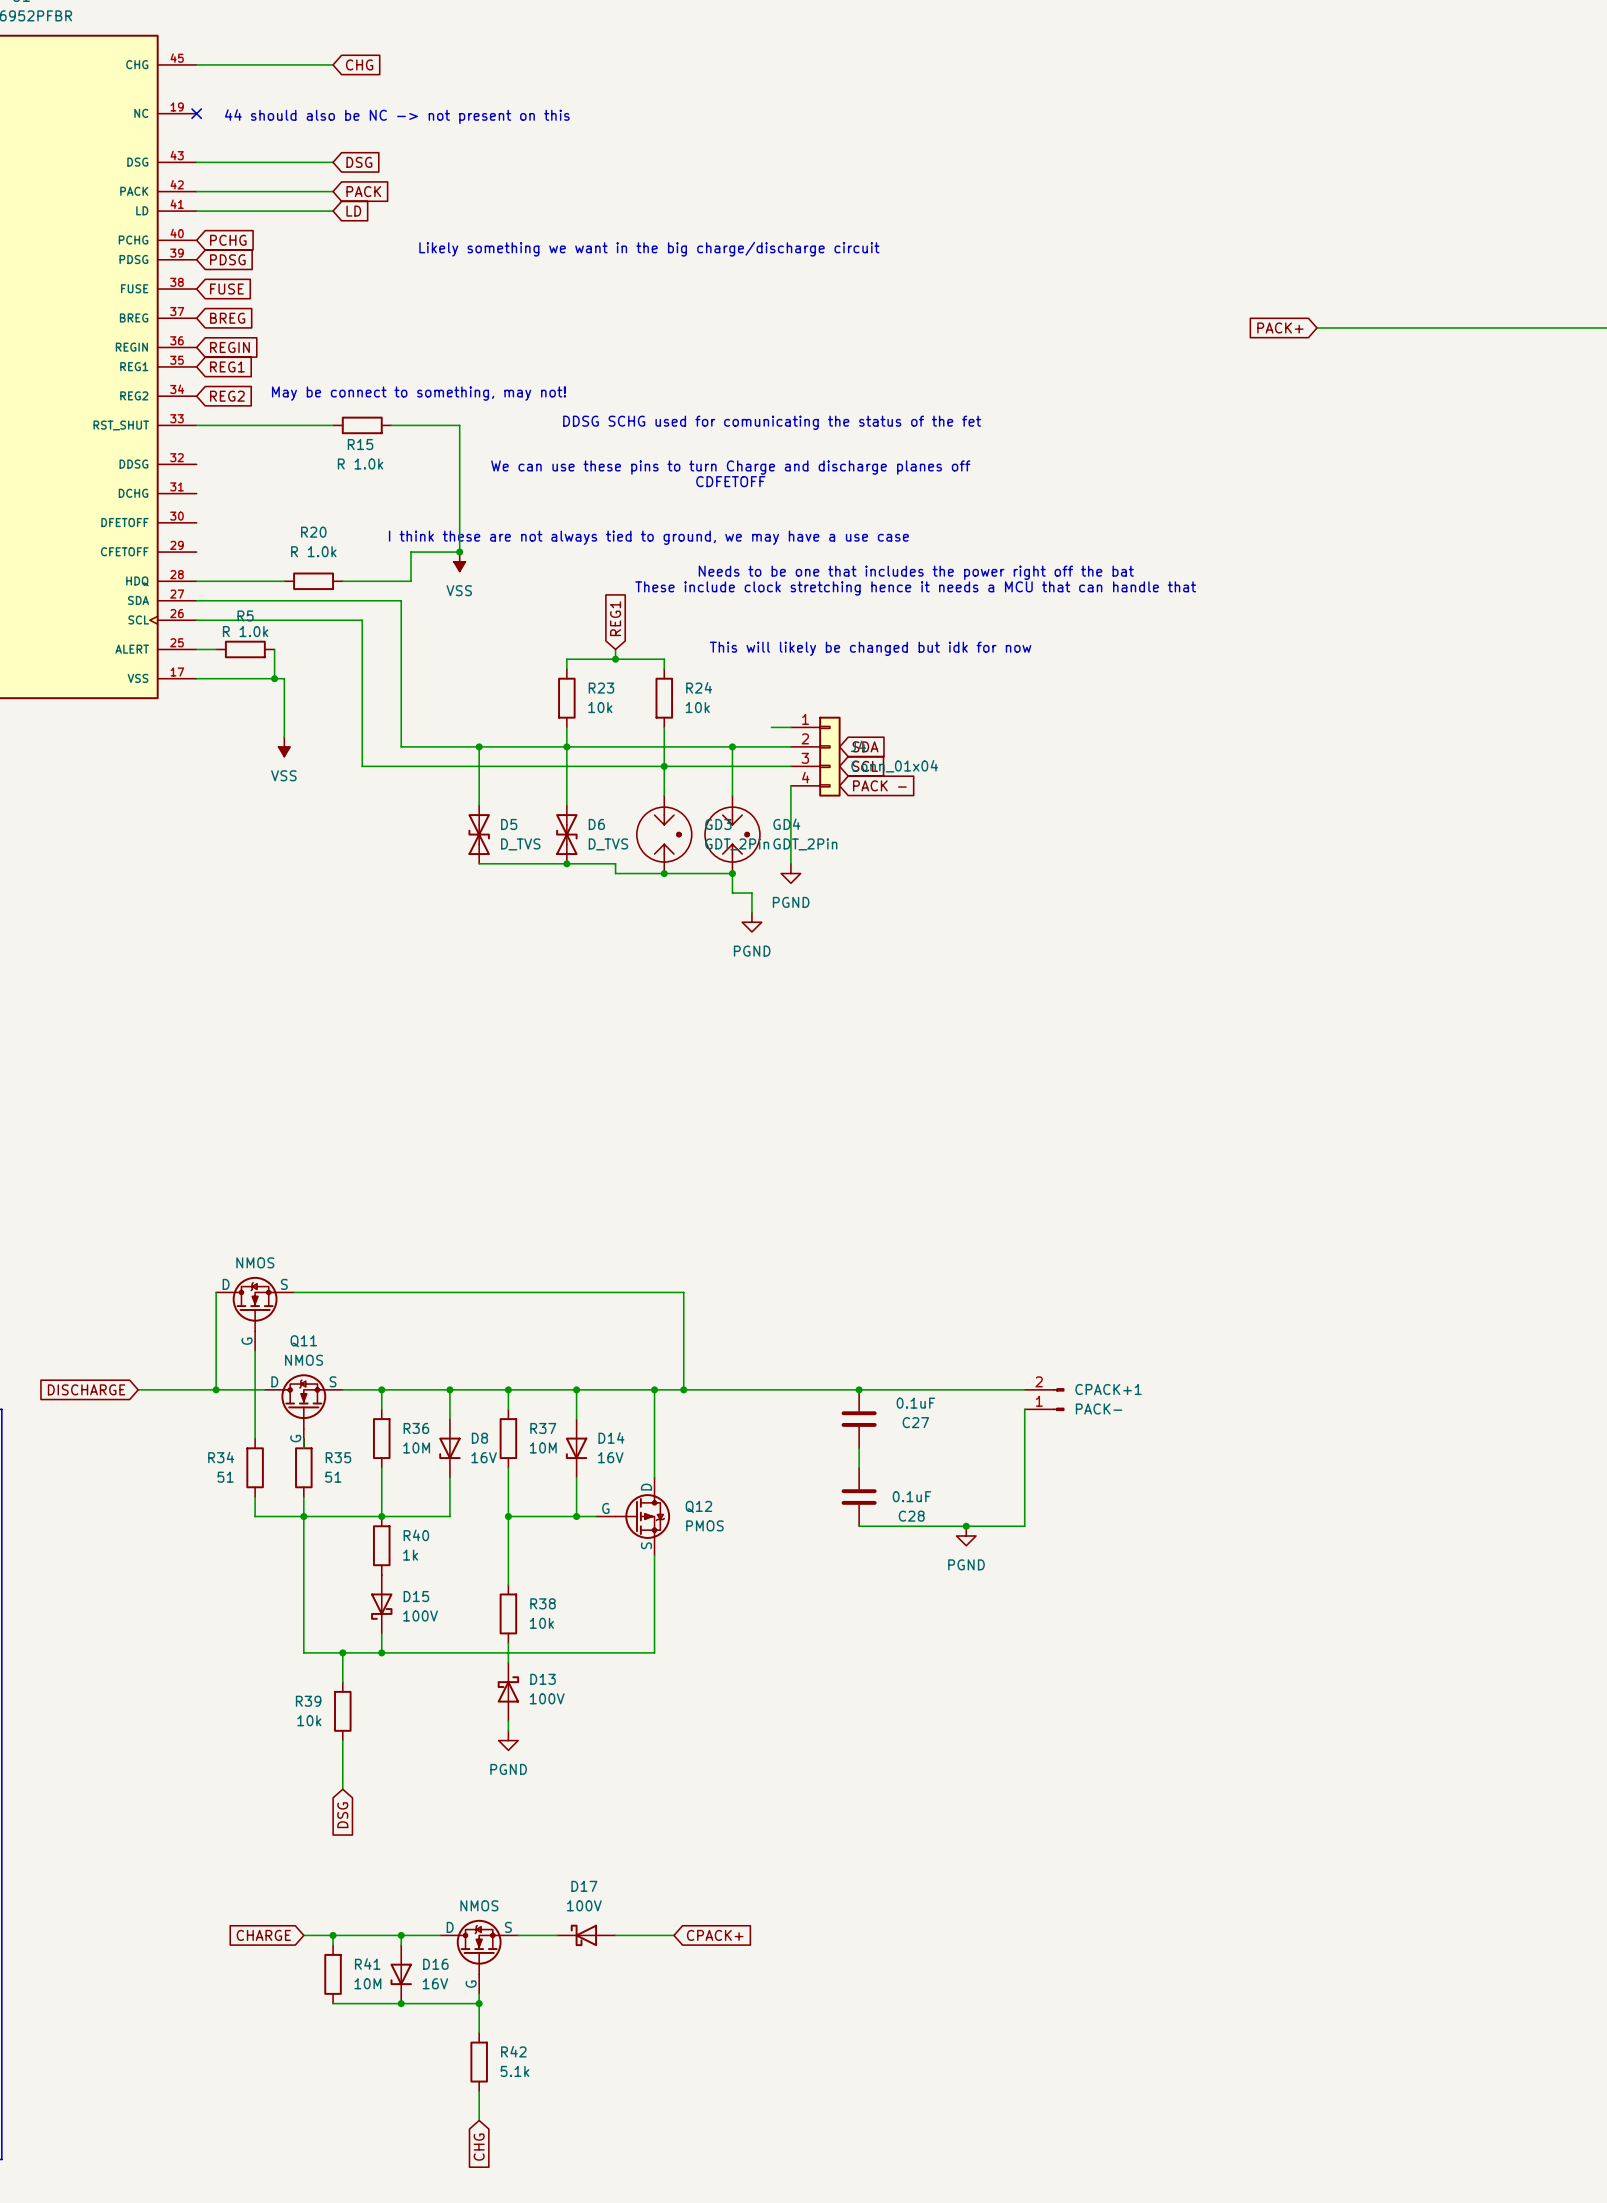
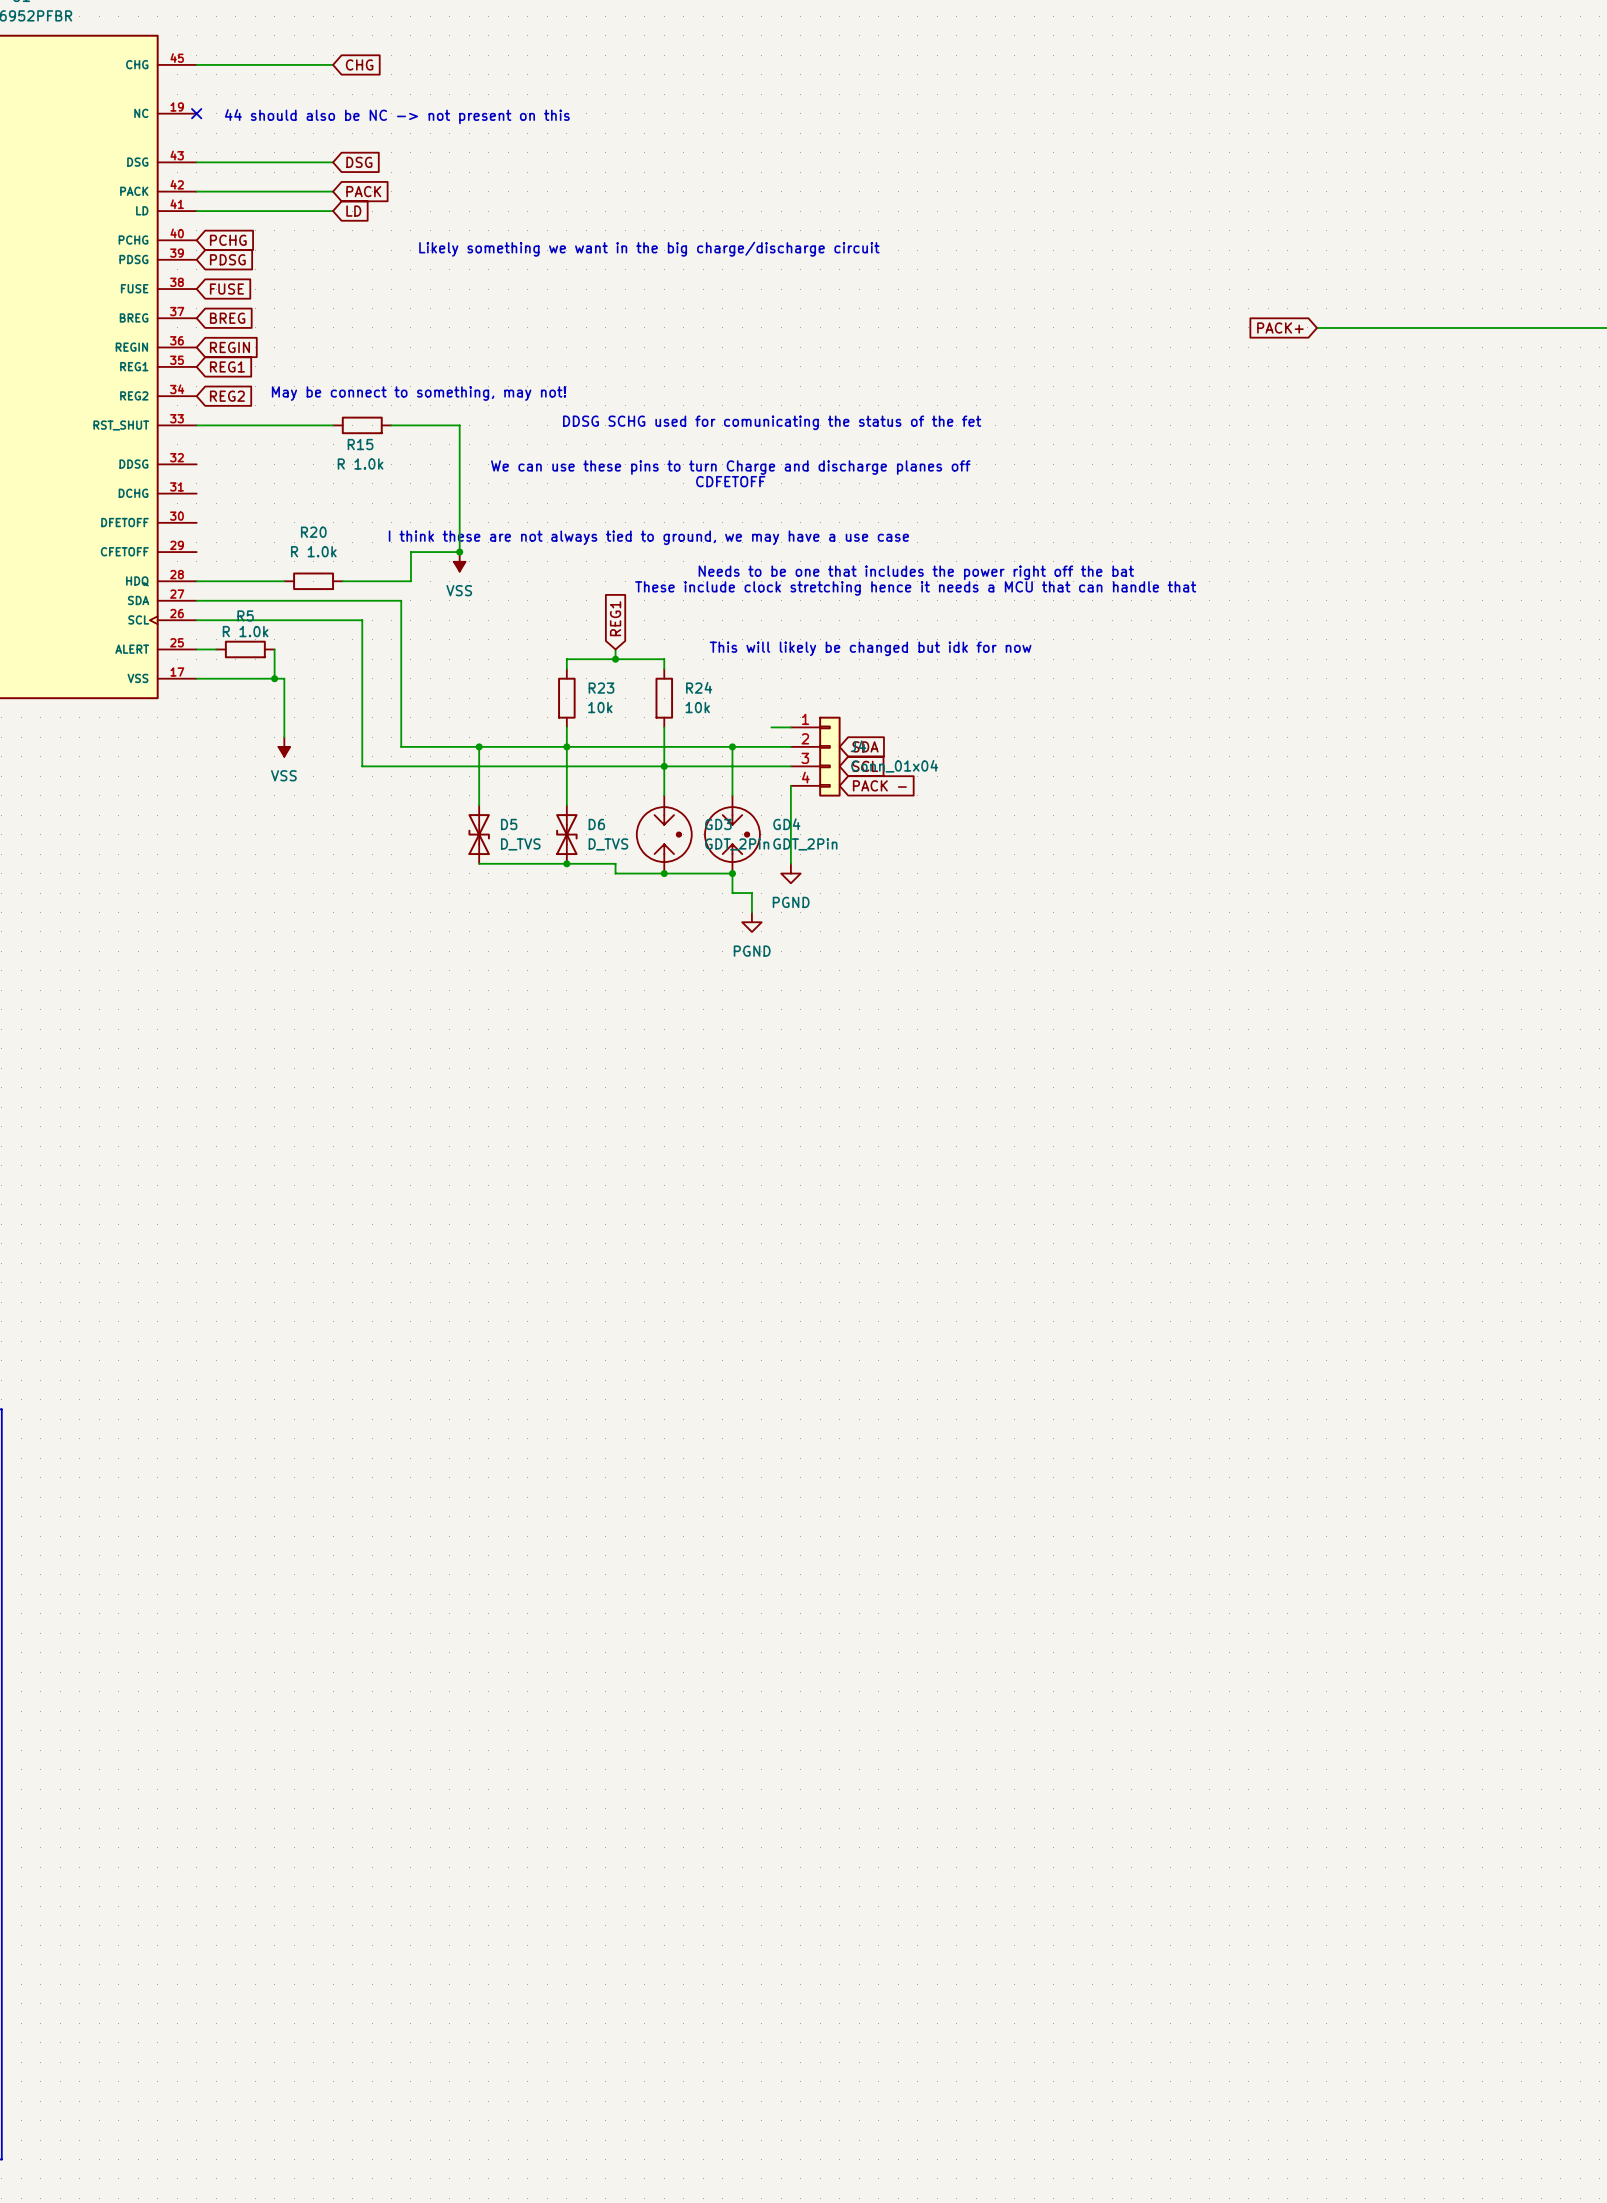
wire: (216, 1292) (216, 1389) -> none
wire: (294, 1292) (683, 1292) (683, 1389) -> none
part: NMOS (255, 1313) -> none
wire: (255, 1350) (255, 1438) -> none
global label: DISCHARGE (86, 1389) -> none
wire: (138, 1389) (264, 1389) -> none
junction: (216, 1389) -> none
wire: (342, 1389) (1024, 1389) -> none
wire: (381, 1389) (381, 1409) -> none
junction: (381, 1389) -> none
wire: (449, 1389) (449, 1419) -> none
junction: (449, 1389) -> none
wire: (508, 1389) (508, 1409) -> none
junction: (508, 1389) -> none
wire: (576, 1389) (576, 1419) -> none
junction: (576, 1389) -> none
wire: (654, 1389) (654, 1477) -> none
junction: (654, 1389) -> none
junction: (683, 1389) -> none
junction: (859, 1389) -> none
CPACK+1: PACK- (1044, 1399) -> none
wire: (1024, 1409) (1024, 1526) (859, 1526) -> none
Q11: NMOS (303, 1411) -> none
C27: 0.1uF (859, 1419) -> none
wire: (303, 1438) (303, 1448) -> none
R36: 10M (381, 1438) -> none
R37: 10M (508, 1438) -> none
D8: 16V (449, 1448) -> none
D14: 16V (576, 1448) -> none
wire: (859, 1448) (859, 1467) -> none
R34: 51 (255, 1467) -> none
R35: 51 (303, 1467) -> none
wire: (381, 1467) (381, 1516) -> none
wire: (508, 1467) (508, 1584) -> none
wire: (449, 1477) (449, 1516) (255, 1516) (255, 1497) -> none
wire: (576, 1477) (576, 1516) -> none
wire: (303, 1497) (303, 1652) (654, 1652) (654, 1555) -> none
C28: 0.1uF (859, 1497) -> none
junction: (303, 1516) -> none
junction: (381, 1516) -> none
wire: (508, 1516) (596, 1516) -> none
junction: (508, 1516) -> none
junction: (576, 1516) -> none
Q12: PMOS (633, 1516) -> none
junction: (966, 1526) -> none
power symbol: PGND (966, 1536) -> none
R40: 1k (381, 1545) -> none
D15: 100V (381, 1604) -> none
R38: 10k (508, 1613) -> none
wire: (381, 1633) (381, 1652) -> none
wire: (508, 1643) (508, 1662) -> none
wire: (342, 1652) (342, 1682) -> none
junction: (342, 1652) -> none
junction: (381, 1652) -> none
D13: 100V (508, 1691) -> none
R39: 10k (342, 1711) -> none
wire: (508, 1721) (508, 1730) -> none
wire: (342, 1740) (342, 1789) -> none
power symbol: PGND (508, 1740) -> none
global label: DSG (342, 1815) -> none
global label: CHARGE (263, 1935) -> none
wire: (303, 1935) (440, 1935) -> none
wire: (333, 1935) (333, 1945) -> none
junction: (333, 1935) -> none
wire: (401, 1935) (401, 1945) -> none
junction: (401, 1935) -> none
wire: (518, 1935) (557, 1935) -> none
D17: 100V (586, 1935) -> none
wire: (615, 1935) (674, 1935) -> none
global label: CPACK+ (715, 1935) -> none
part: NMOS (479, 1956) -> none
R41: 10M (333, 1974) -> none
D16: 16V (401, 1974) -> none
wire: (479, 1993) (479, 2032) -> none
wire: (333, 2003) (479, 2003) -> none
junction: (401, 2003) -> none
junction: (479, 2003) -> none
R42: 5.1k (479, 2062) -> none
wire: (479, 2091) (479, 2120) -> none
global label: CHG (479, 2147) -> none

